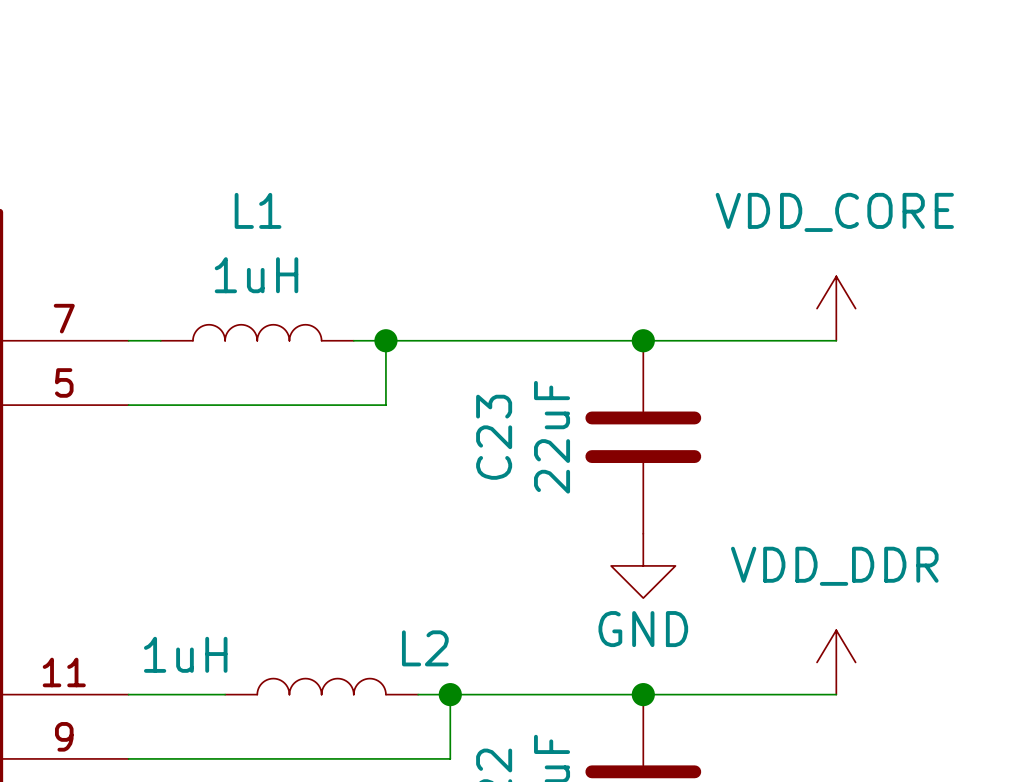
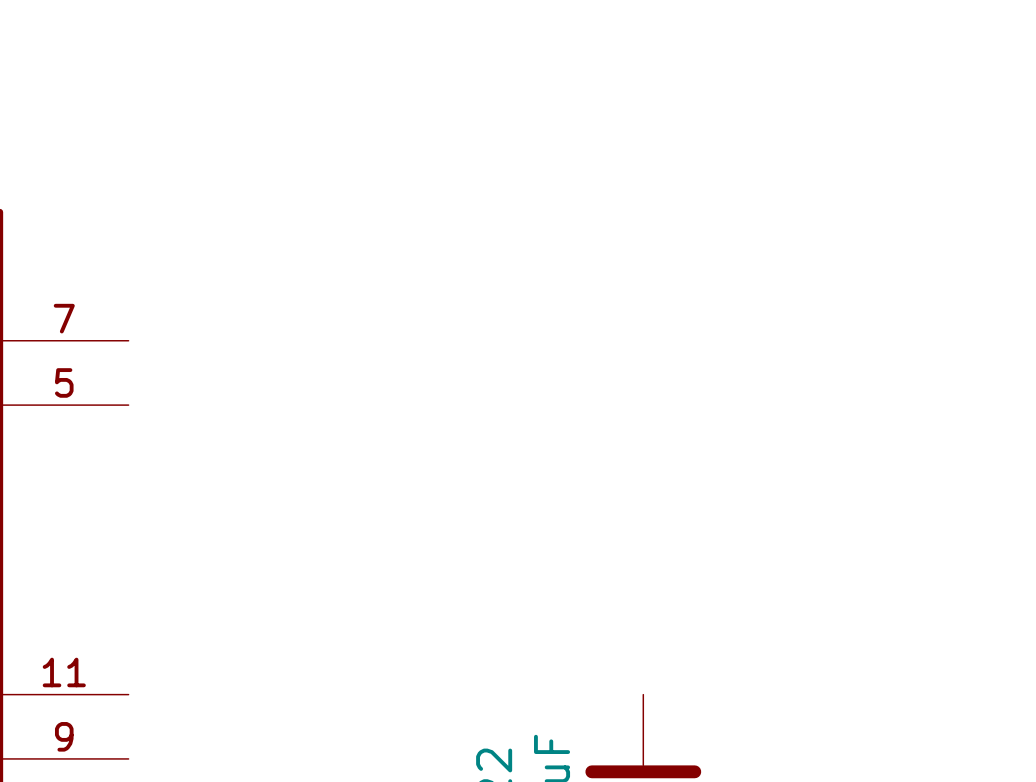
power symbol: VDD_CORE (836, 308) -> none
L1: 1uH (257, 332) -> none
wire: (128, 340) (160, 340) -> none
wire: (353, 340) (836, 340) -> none
wire: (385, 340) (385, 405) (128, 405) -> none
junction: (385, 340) -> none
junction: (643, 340) -> none
C23: 22uF (643, 437) -> none
power symbol: GND (643, 565) -> none
power symbol: VDD_DDR (836, 662) -> none
L2: 1uH (321, 686) -> none
wire: (128, 694) (225, 694) -> none
wire: (418, 694) (836, 694) -> none
wire: (450, 694) (450, 758) (128, 758) -> none
junction: (450, 694) -> none
junction: (643, 694) -> none

